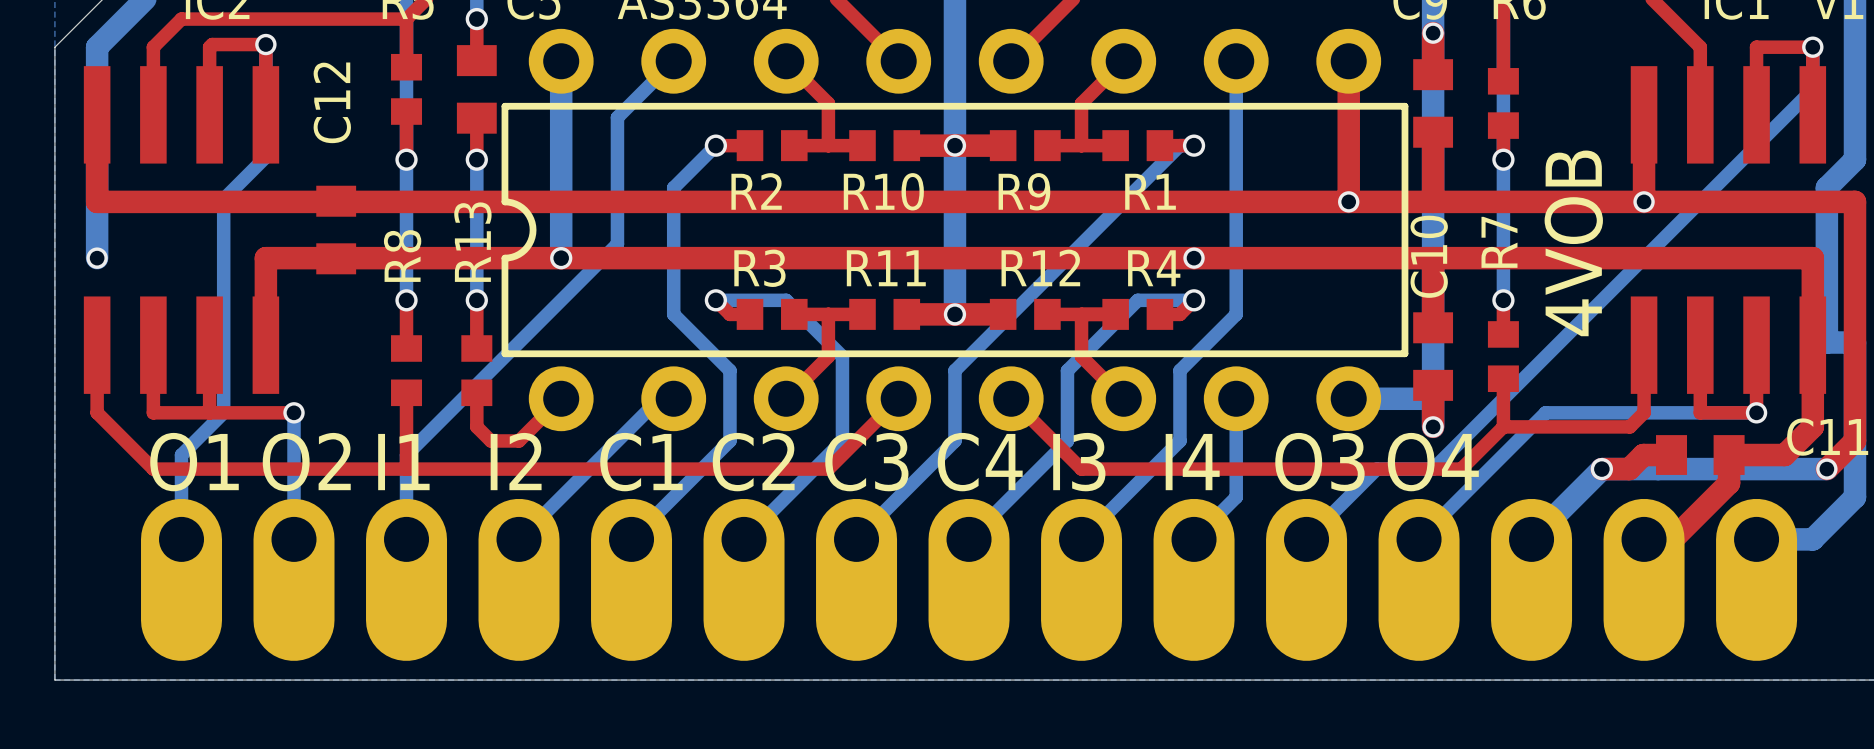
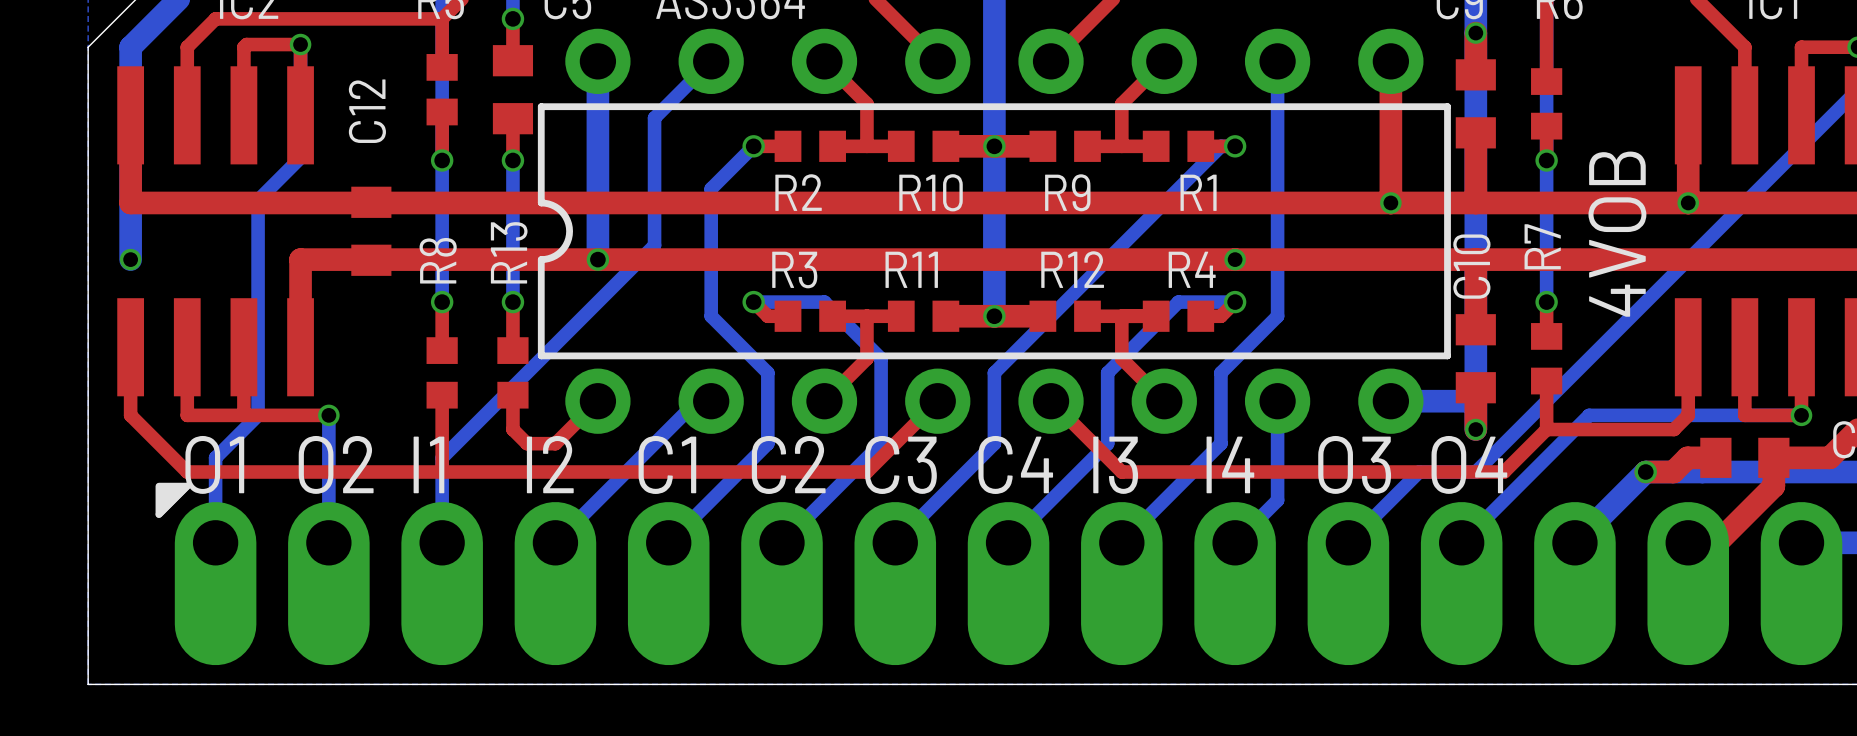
part footprint: [928, 498, 1010, 661] -> [155, 482, 1843, 666]

